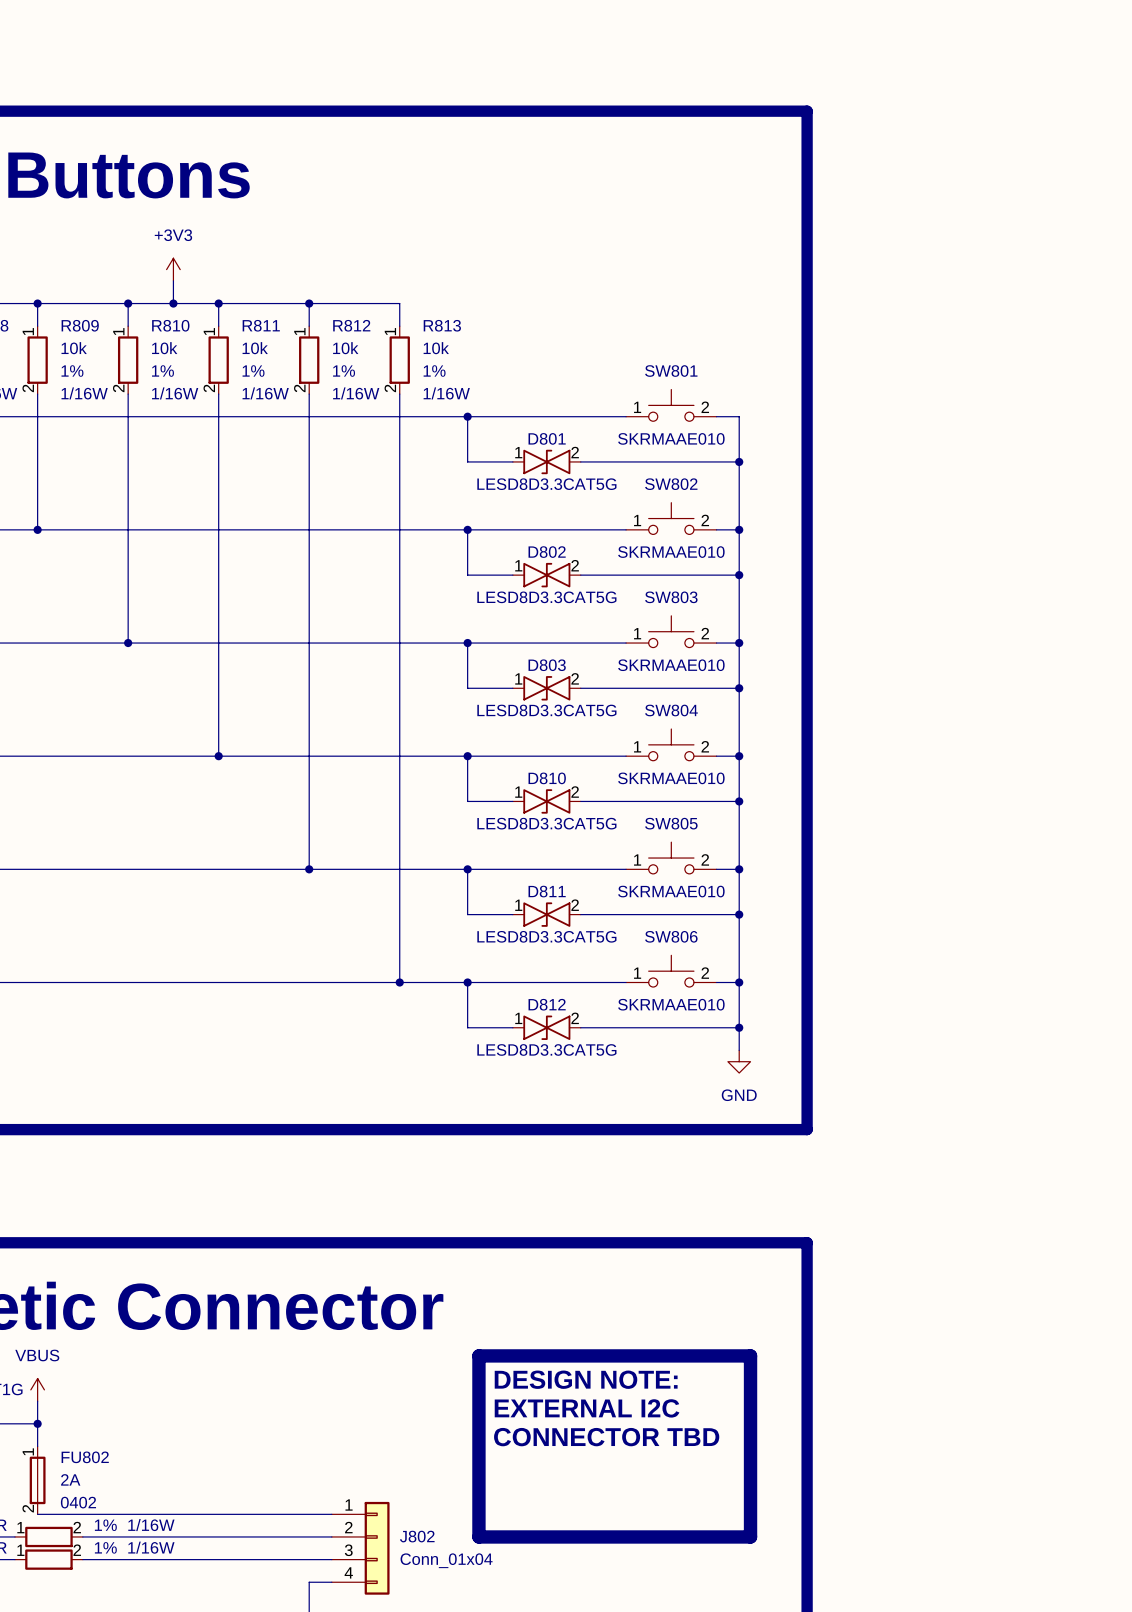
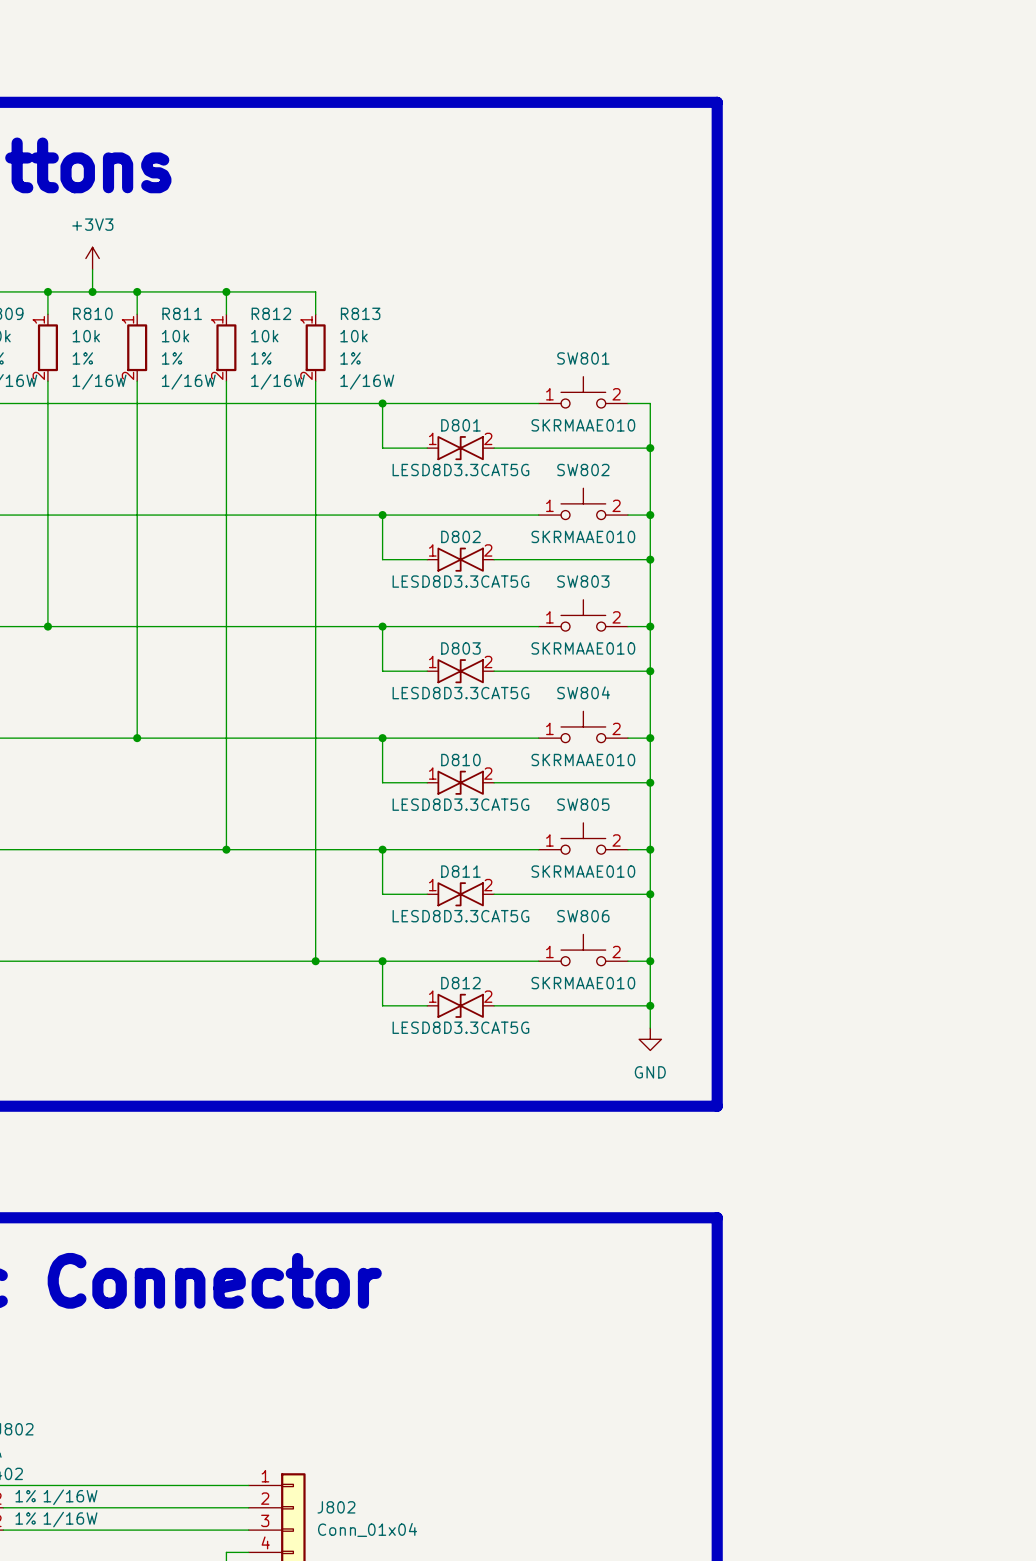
line: (478, 1355) (750, 1355) (750, 1536) (478, 1536) (478, 1355) -> none
text: DESIGN NOTE: (586, 1379) -> none
text: EXTERNAL I2C (587, 1408) -> none
text: CONNECTOR TBD (606, 1437) -> none

